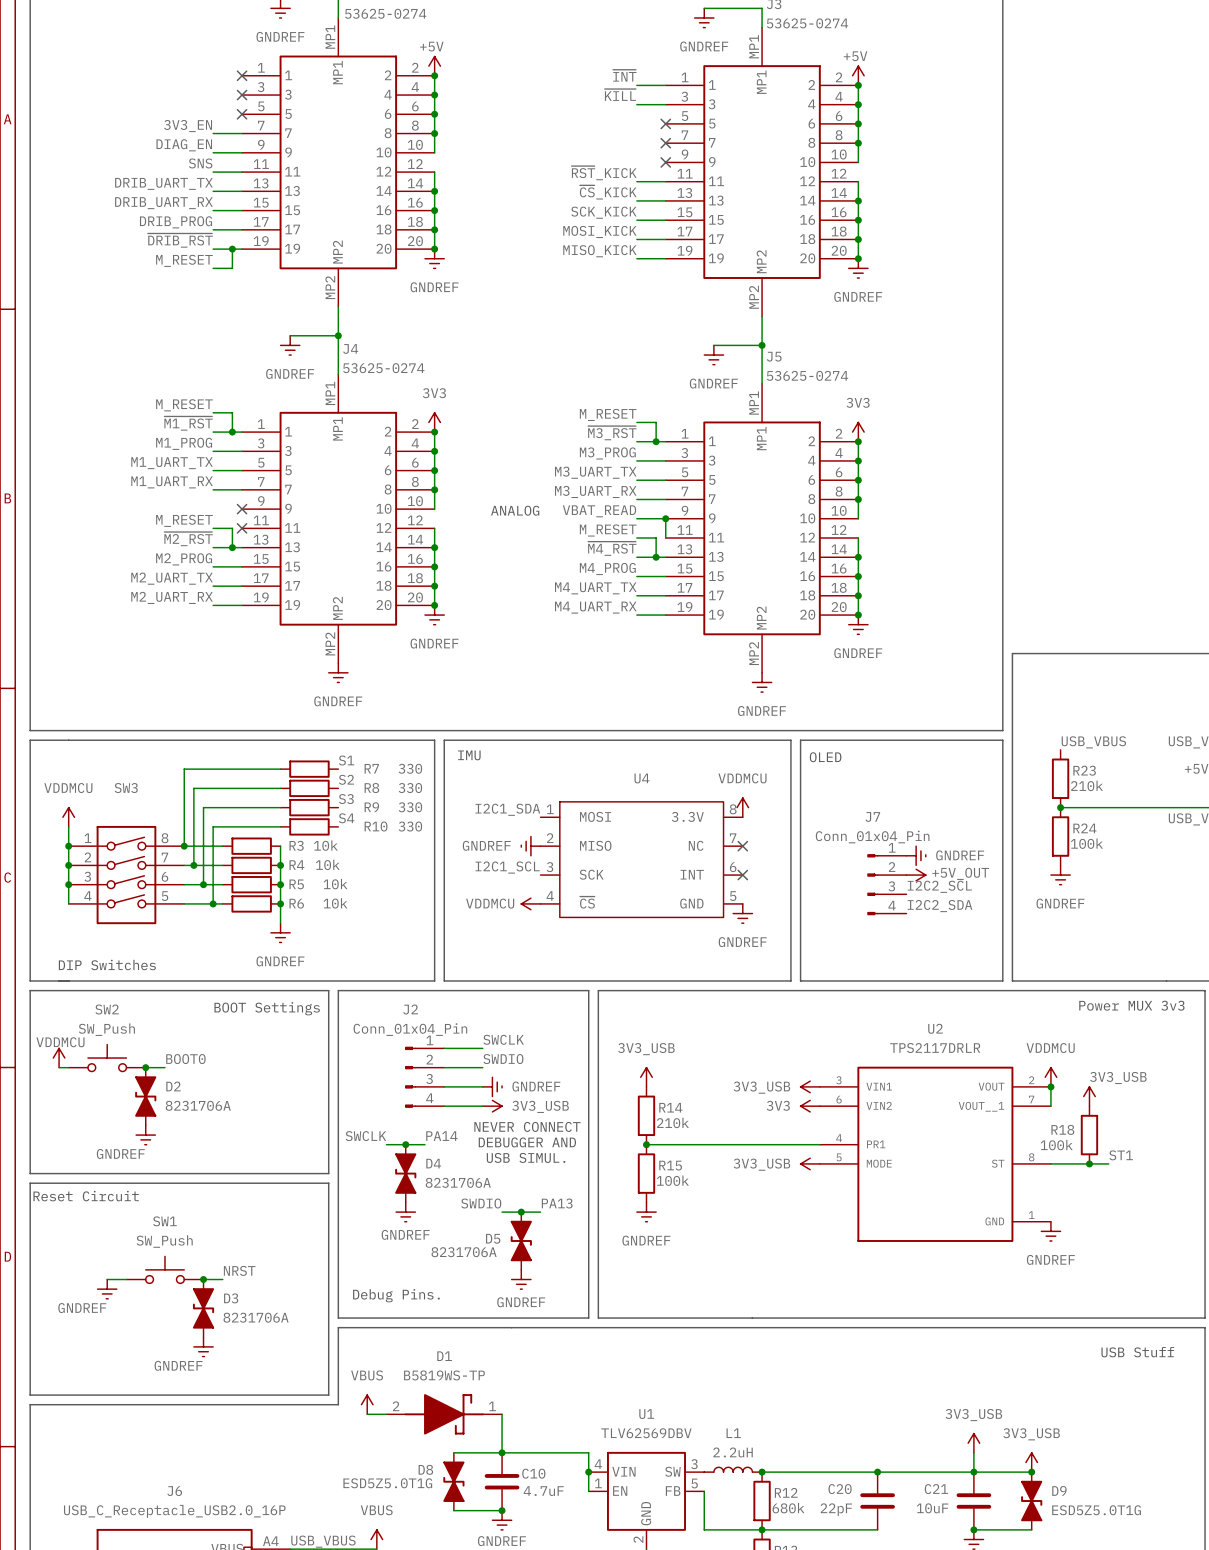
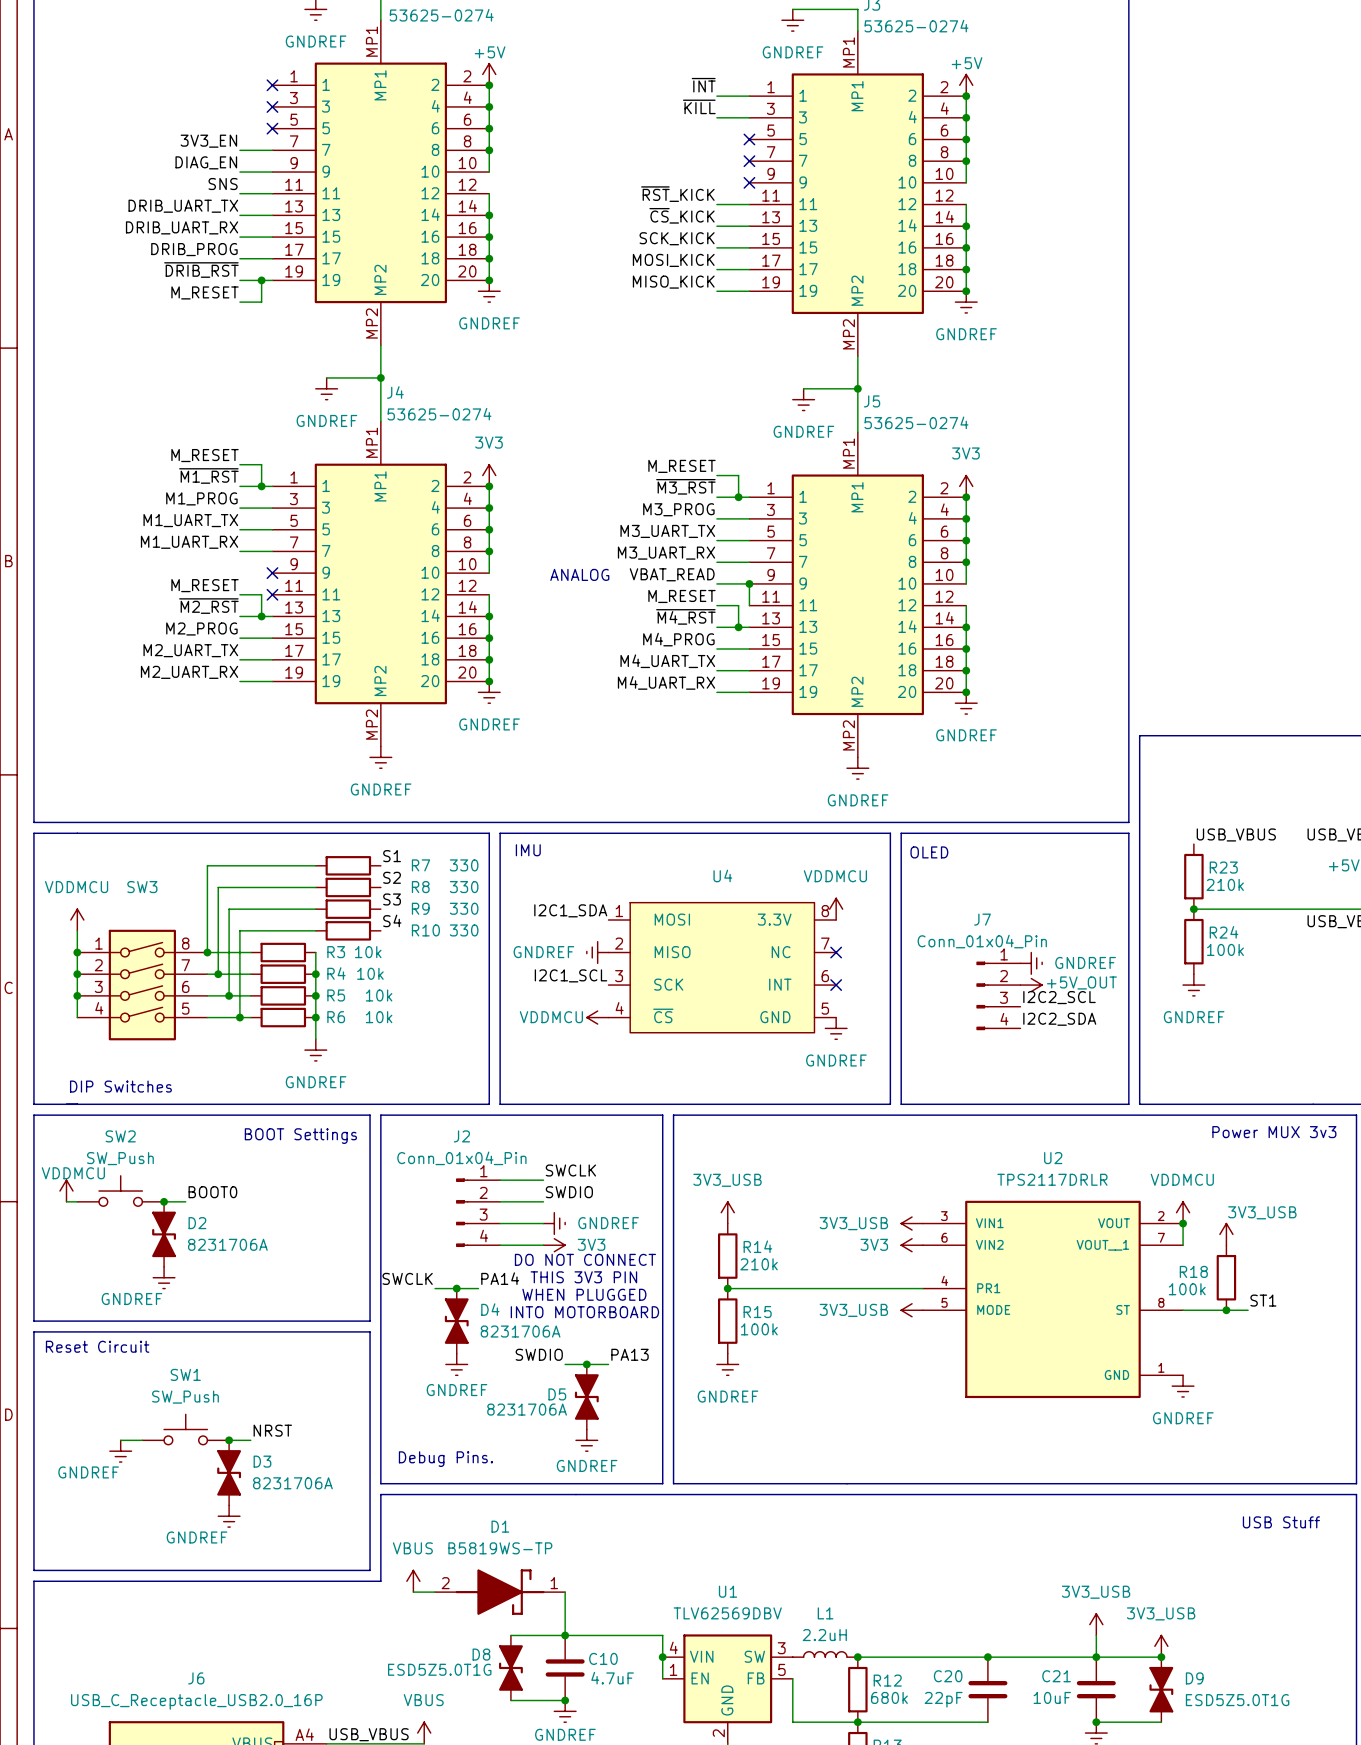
power symbol: 3V3_USB (492, 1106) -> 3V3 (554, 1245)
text: NEVER CONNECT (527, 1126) -> DO NOT CONNECT (585, 1259)
text: none -> THIS 3V3 PIN (583, 1277)
text: DEBUGGER AND (527, 1142) -> none
text: none -> WHEN PLUGGED (584, 1294)
text: USB SIMUL. (526, 1157) -> none
text: none -> INTO MOTORBOARD (584, 1312)

